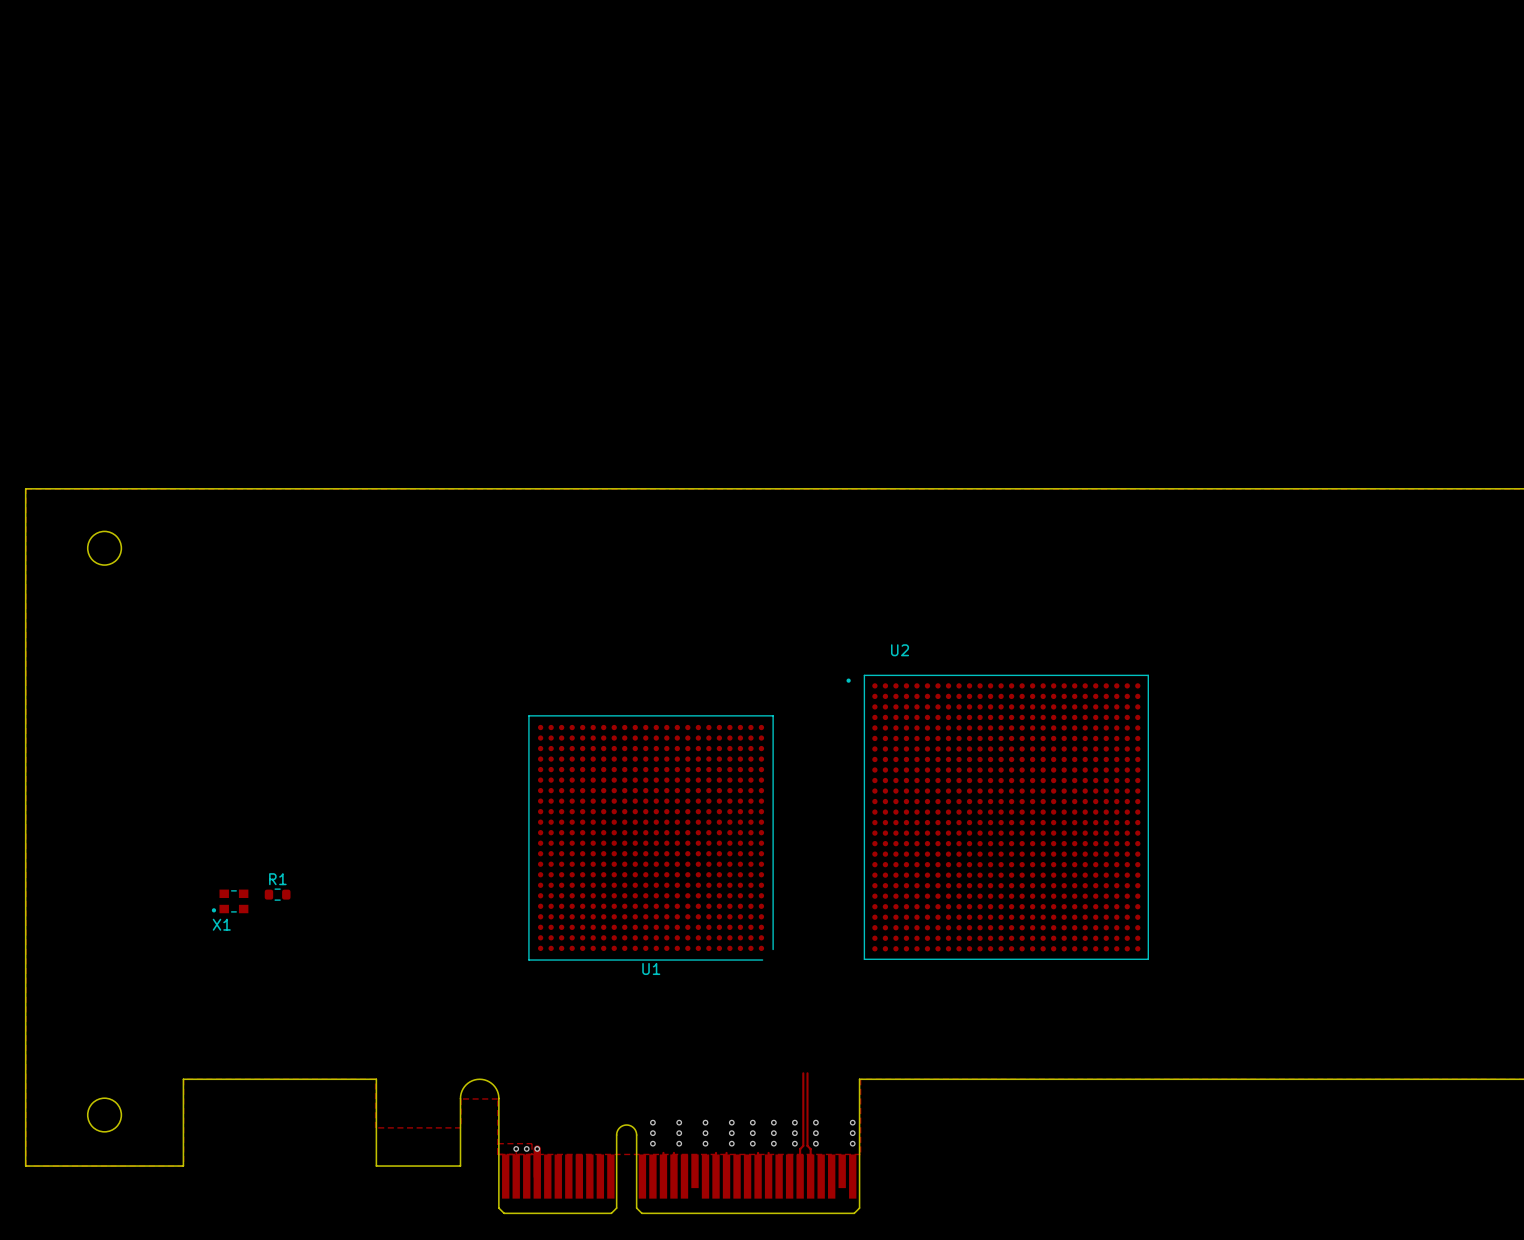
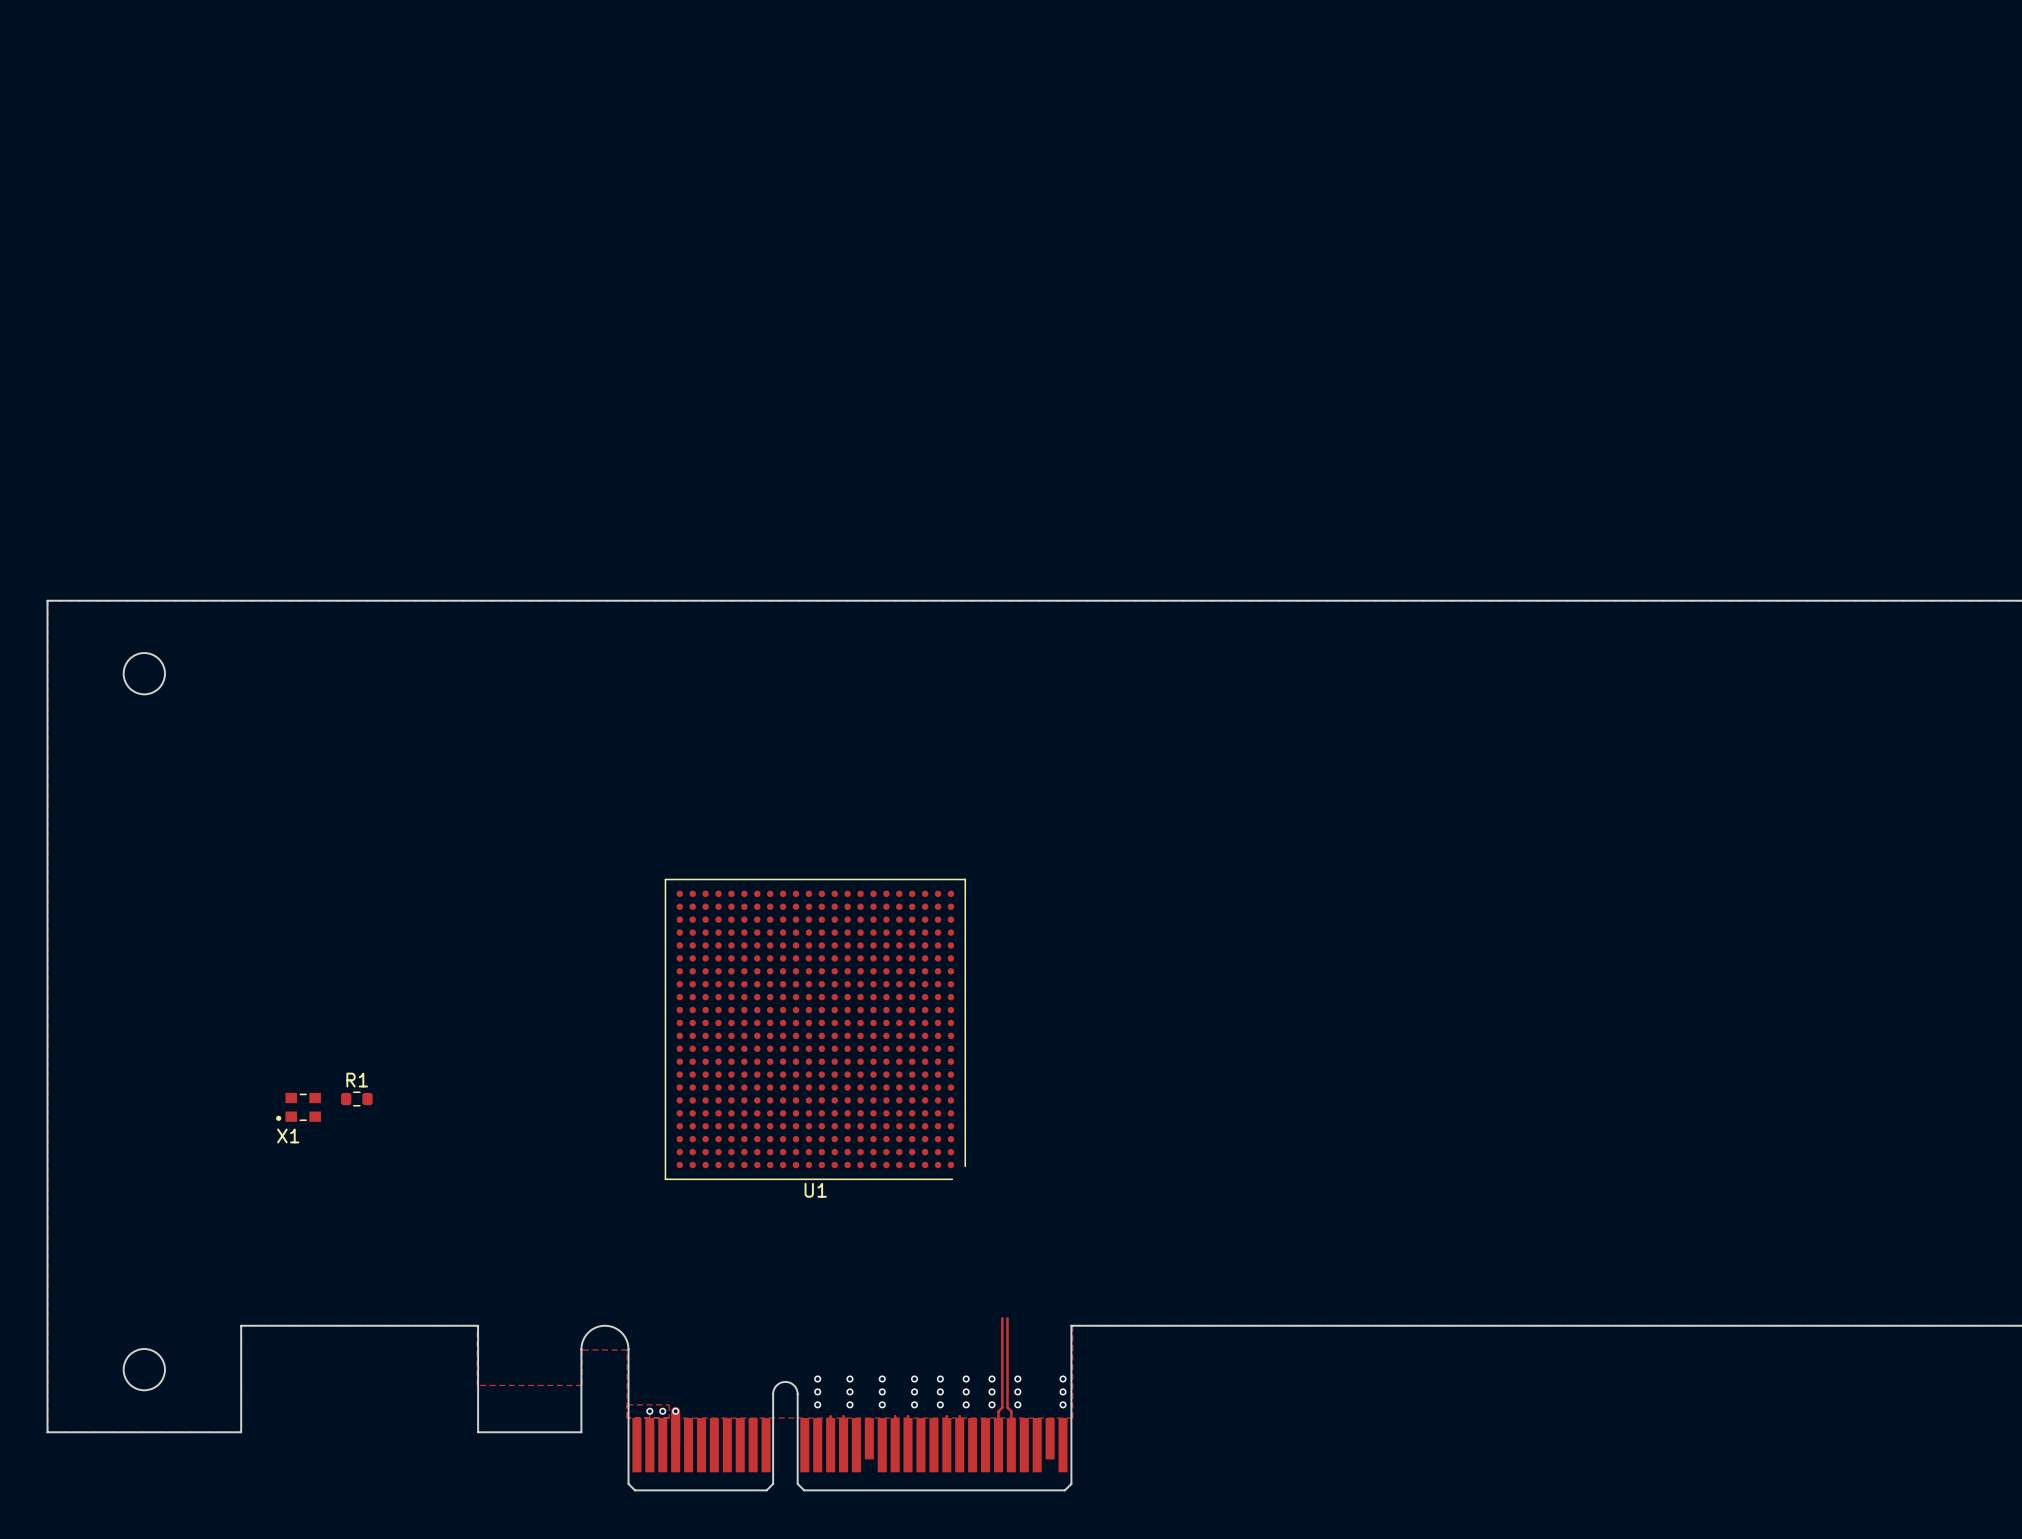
U2: (997, 817) -> none

